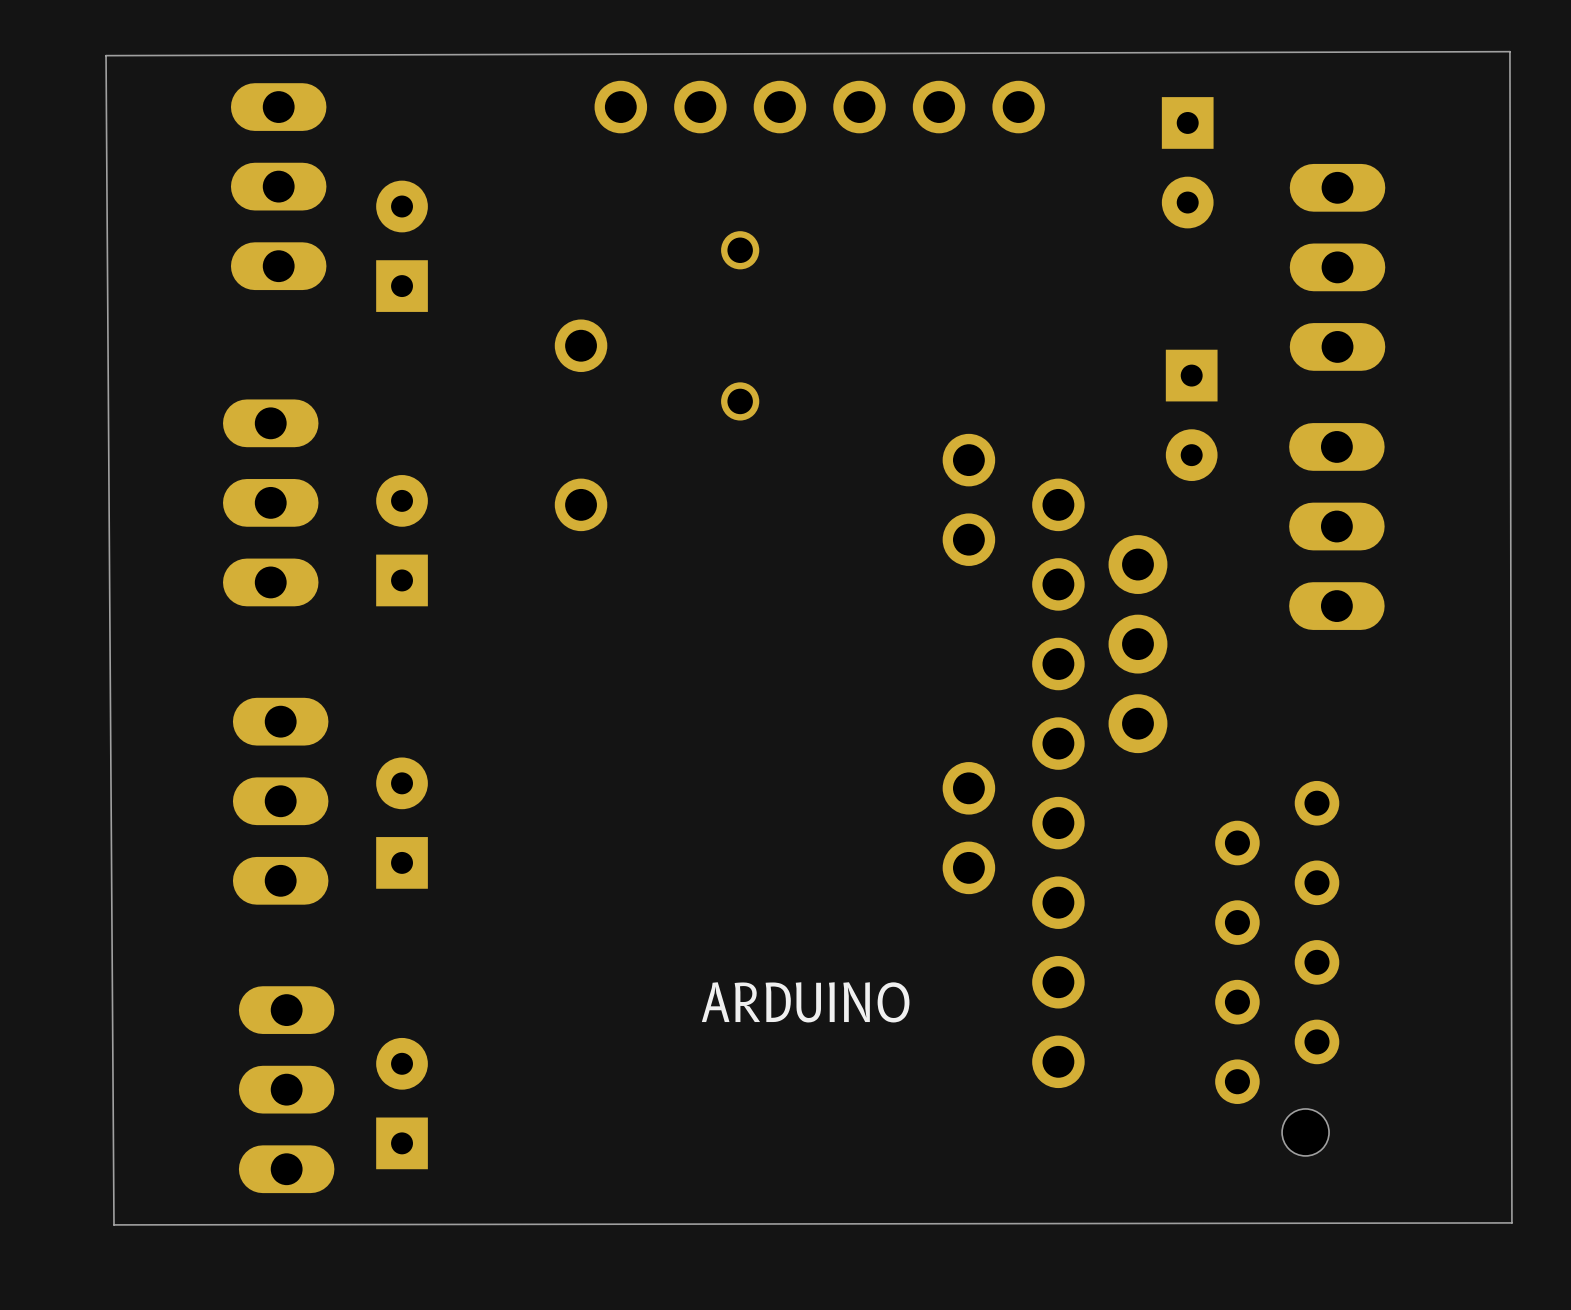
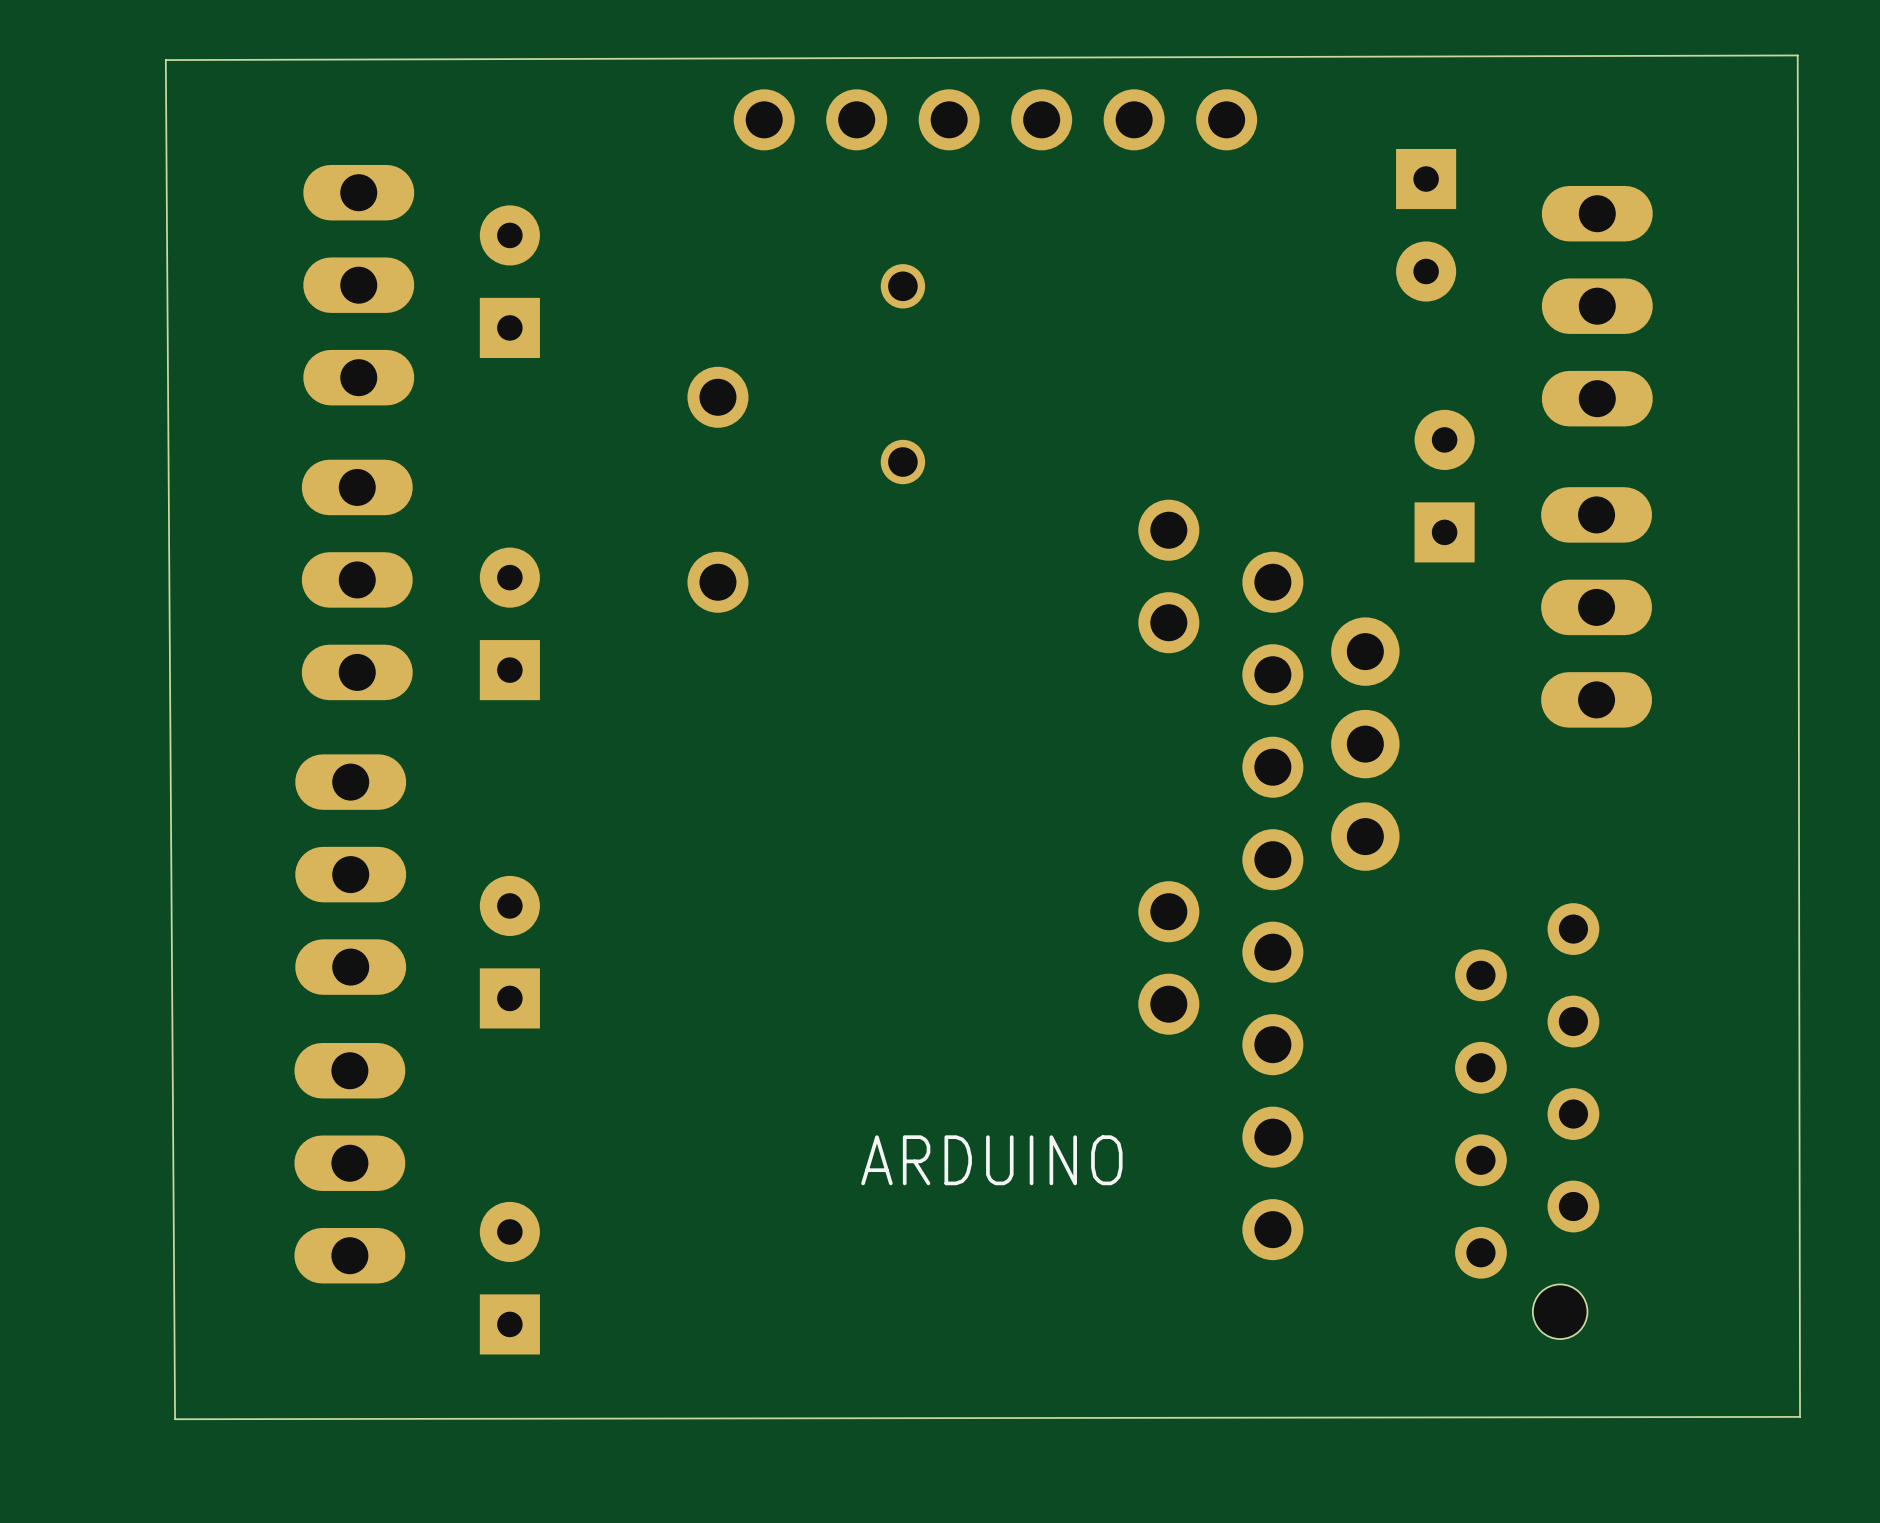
part position: (1187, 162) -> (1426, 225)
part position: (278, 186) -> (358, 285)
part rotation: 0° (1191, 415) -> 180° (1444, 486)
part position: (280, 801) -> (350, 874)
part position: (286, 1089) -> (349, 1163)

